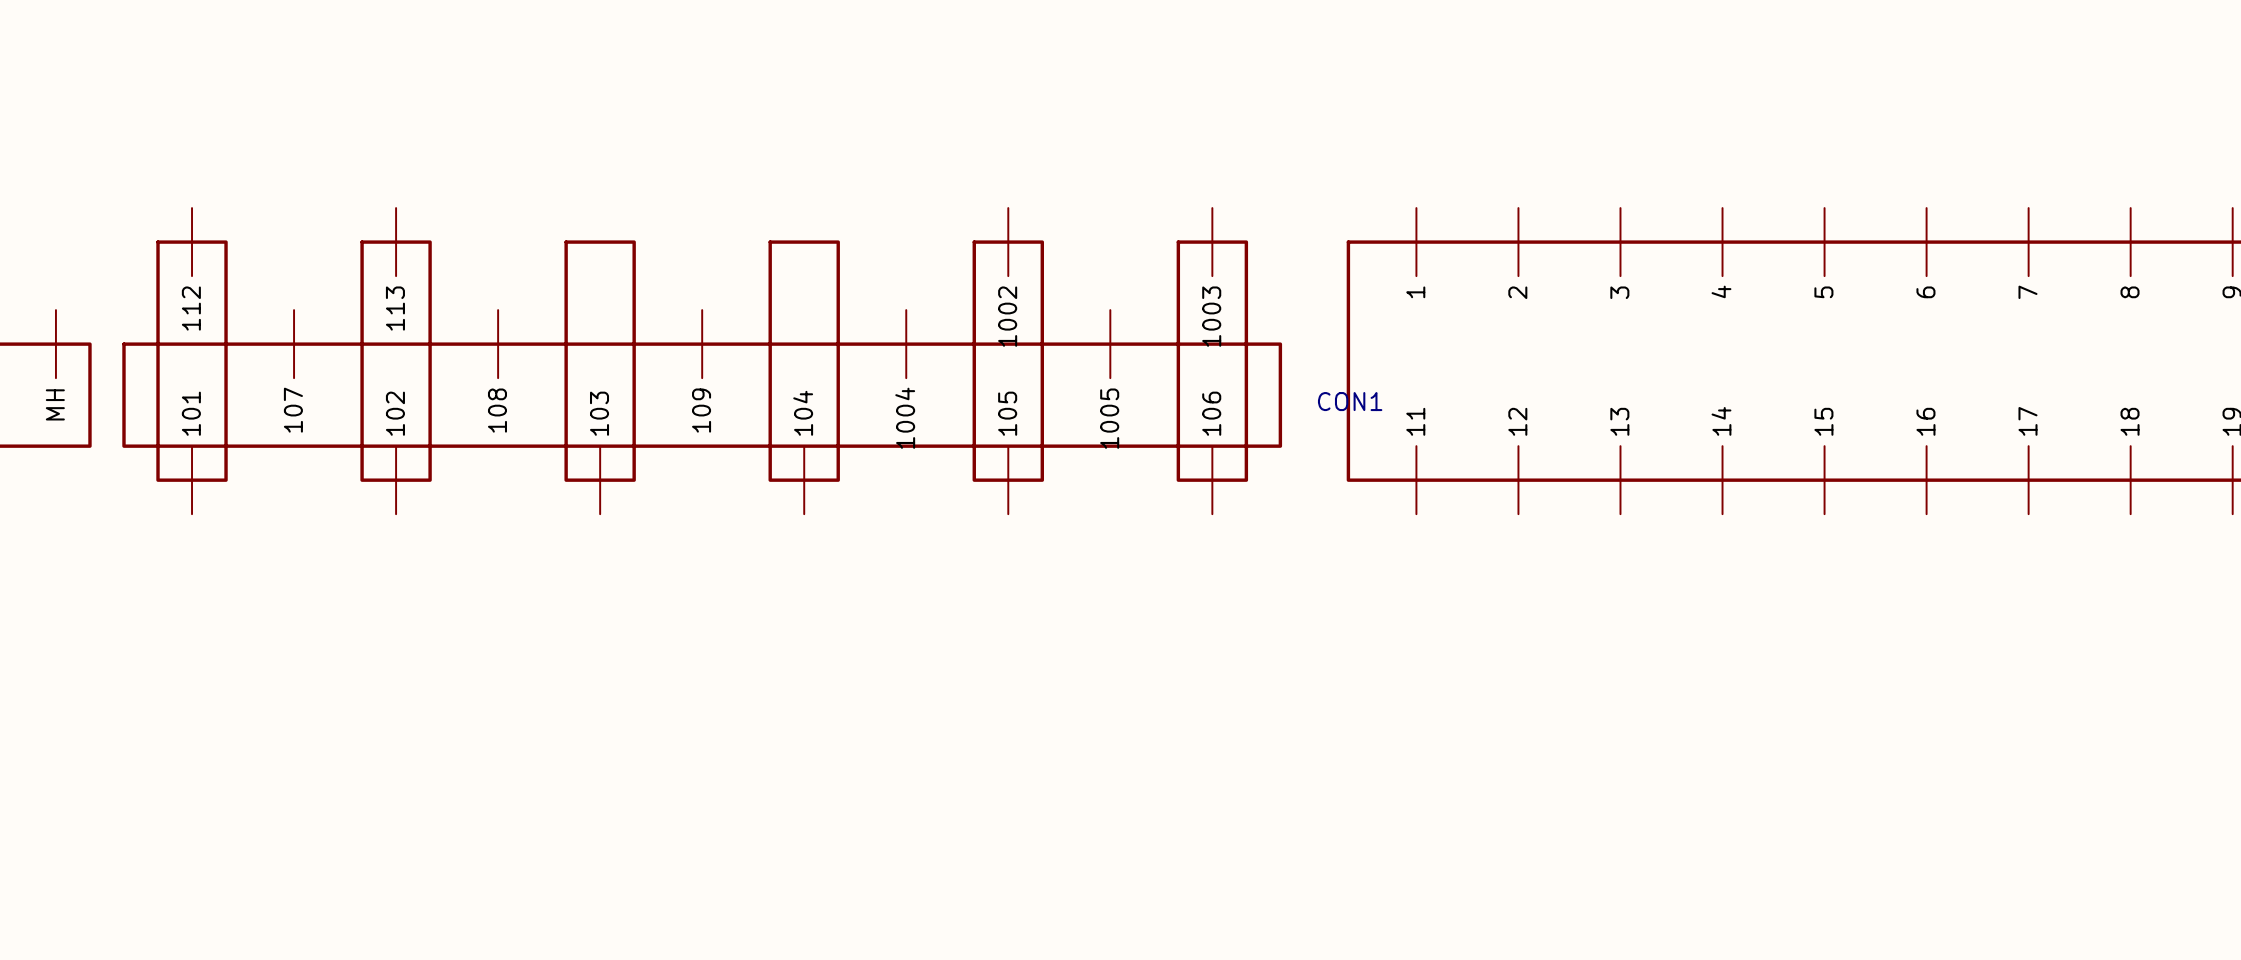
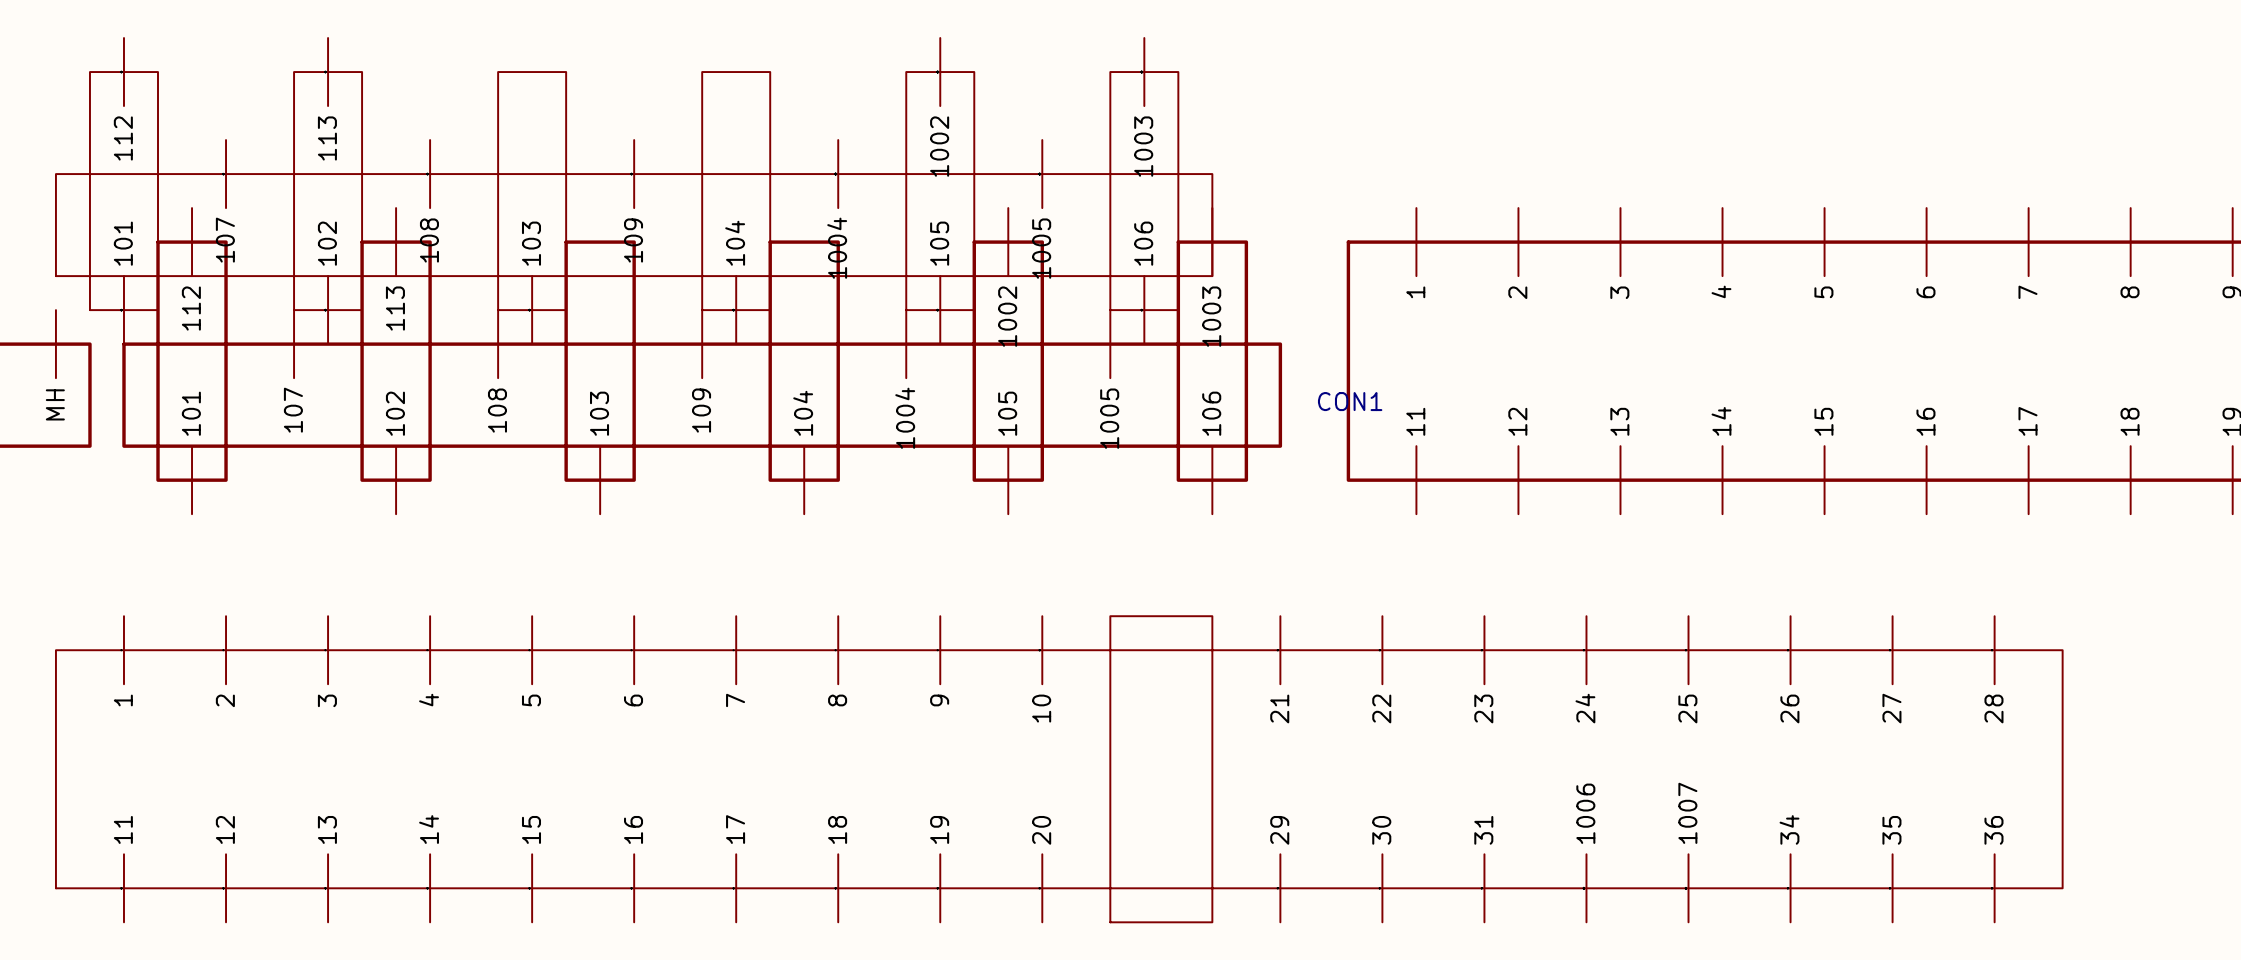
part: none -> (634, 191)
part: none -> (1059, 769)

